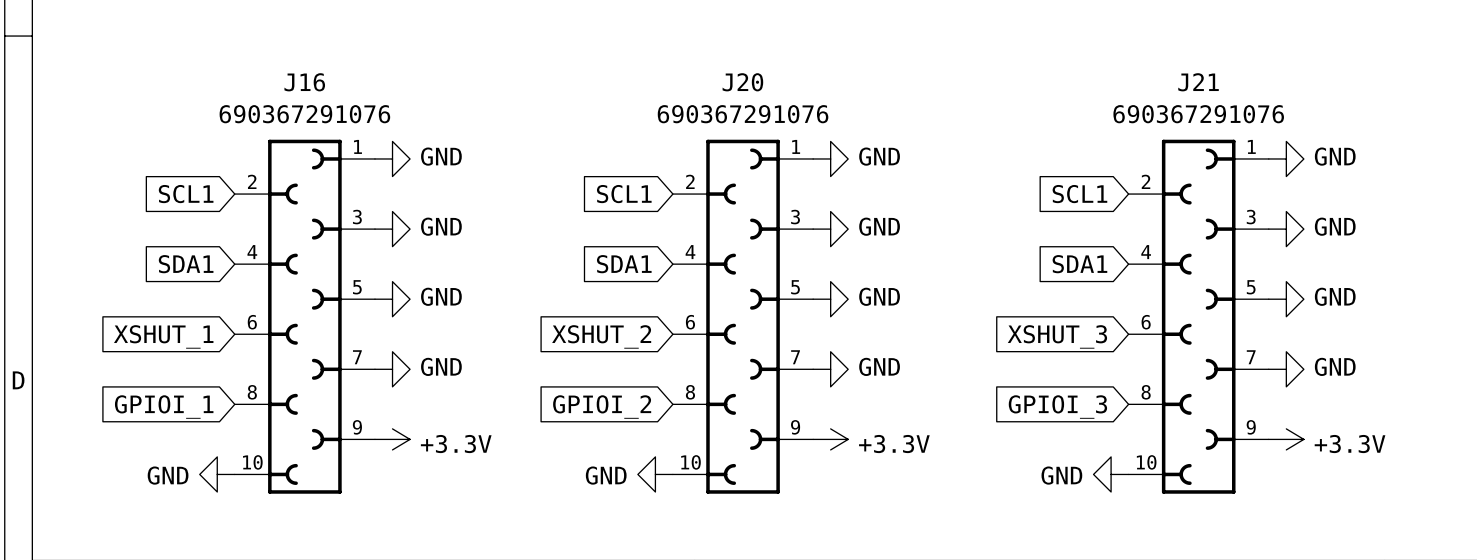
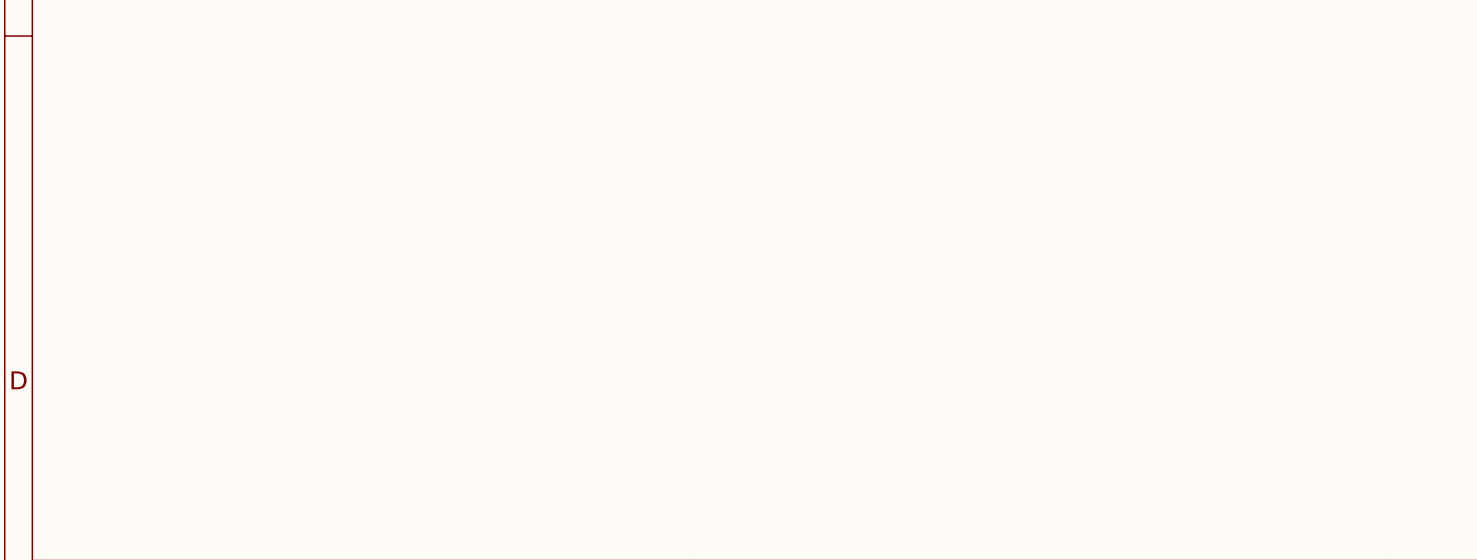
power symbol: GND (392, 158) -> none
power symbol: GND (830, 158) -> none
power symbol: GND (1286, 158) -> none
global label: SCL1 (186, 194) -> none
global label: SCL1 (624, 194) -> none
global label: SCL1 (1079, 194) -> none
power symbol: GND (392, 229) -> none
power symbol: GND (830, 229) -> none
power symbol: GND (1286, 229) -> none
global label: SDA1 (186, 264) -> none
global label: SDA1 (624, 264) -> none
global label: SDA1 (1079, 264) -> none
power symbol: GND (392, 299) -> none
power symbol: GND (830, 299) -> none
power symbol: GND (1286, 299) -> none
J16: 690367291076 (304, 316) -> none
J20: 690367291076 (743, 316) -> none
J21: 690367291076 (1198, 316) -> none
global label: XSHUT_1 (163, 336) -> none
global label: XSHUT_2 (601, 336) -> none
global label: XSHUT_3 (1057, 336) -> none
power symbol: GND (392, 369) -> none
power symbol: GND (830, 369) -> none
power symbol: GND (1286, 369) -> none
global label: GPIOI_1 (164, 407) -> none
global label: GPIOI_2 (602, 407) -> none
global label: GPIOI_3 (1057, 407) -> none
power symbol: +3.3V (392, 439) -> none
power symbol: +3.3V (830, 439) -> none
power symbol: +3.3V (1286, 439) -> none
power symbol: GND (217, 474) -> none
power symbol: GND (655, 474) -> none
power symbol: GND (1111, 474) -> none

